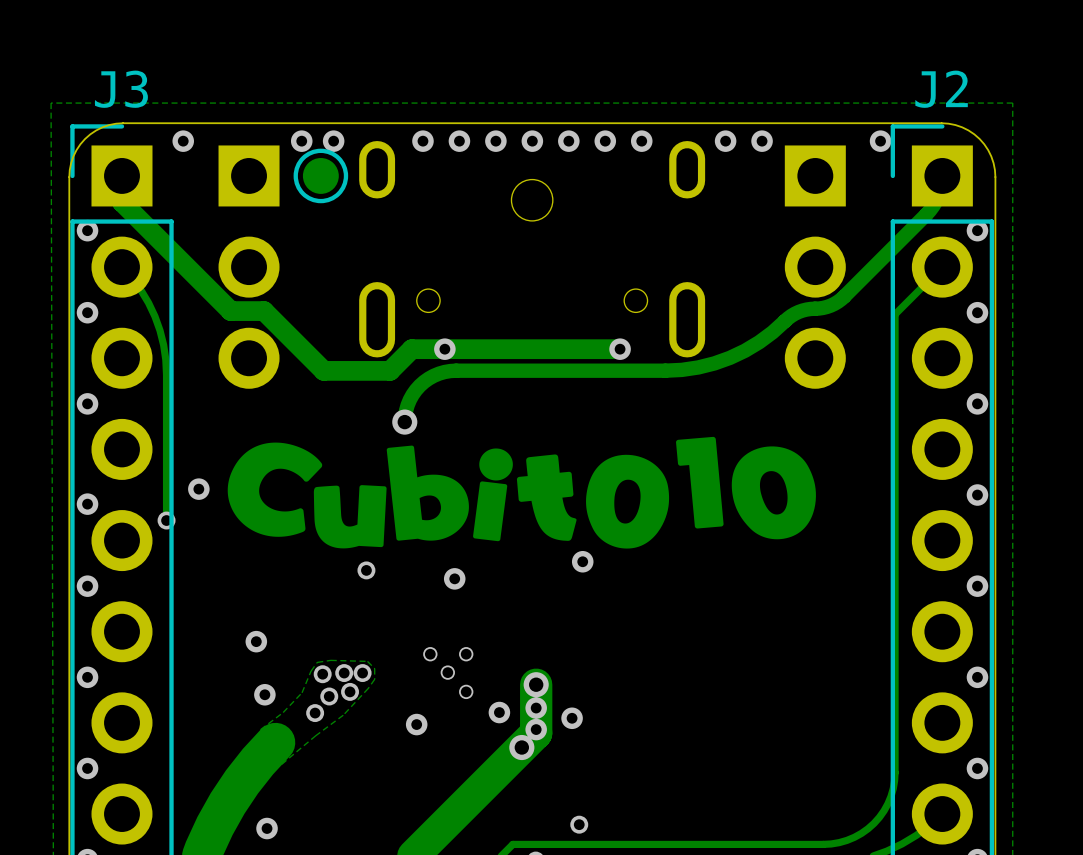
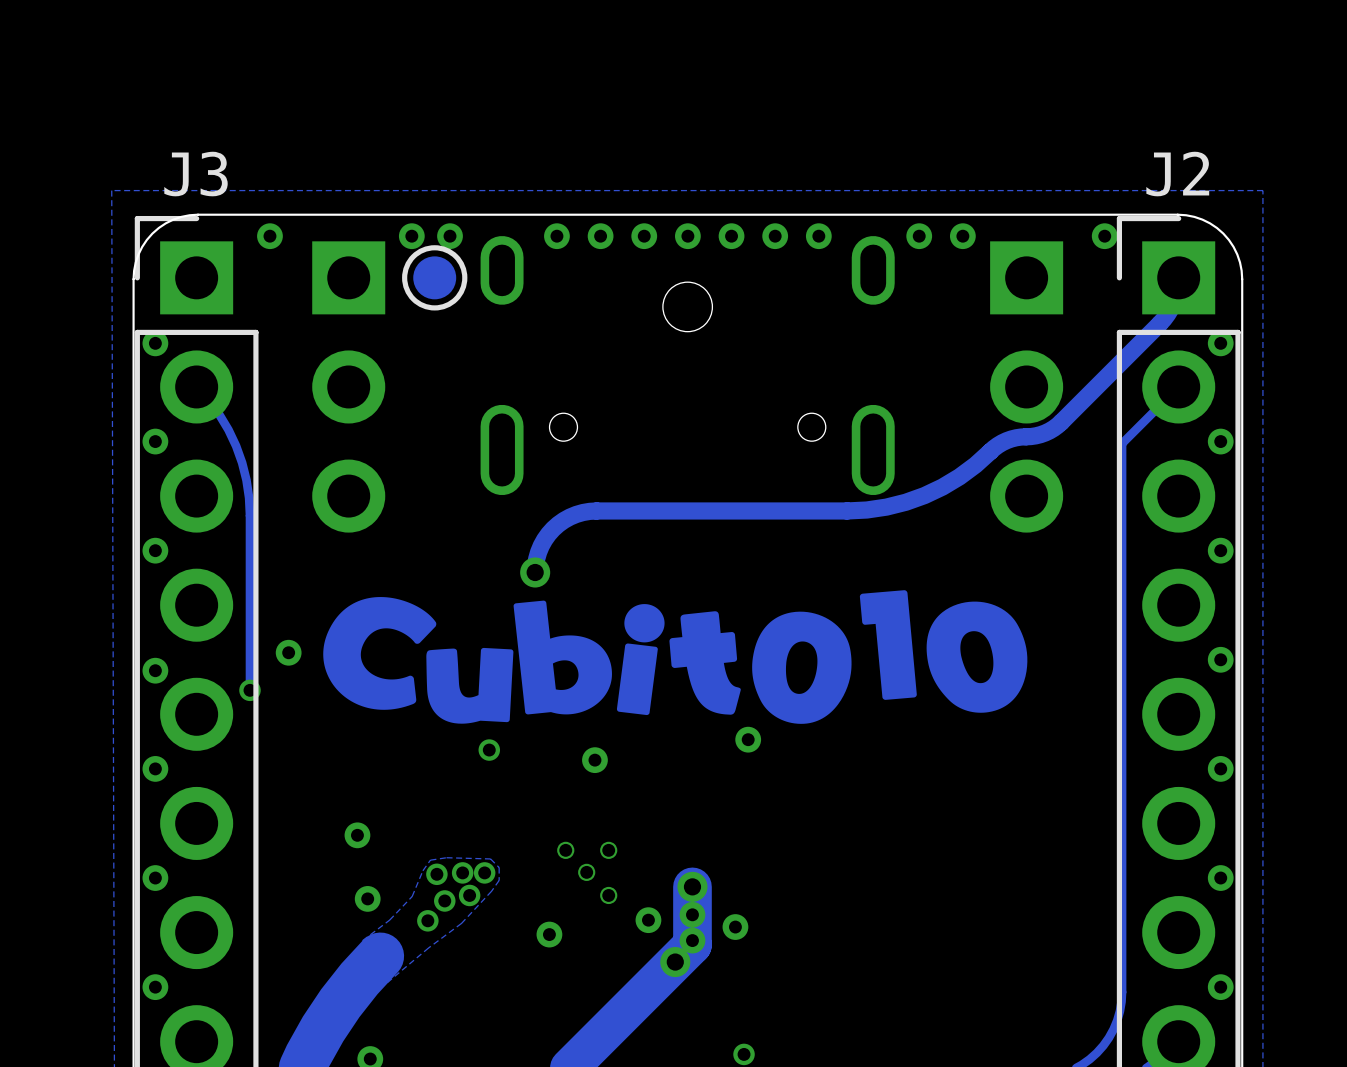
track: (121, 175) (121, 202) (230, 311) (264, 311) (323, 370) (390, 370) (411, 349) (620, 349) -> none
via: (444, 349) -> none
via: (620, 349) -> none

